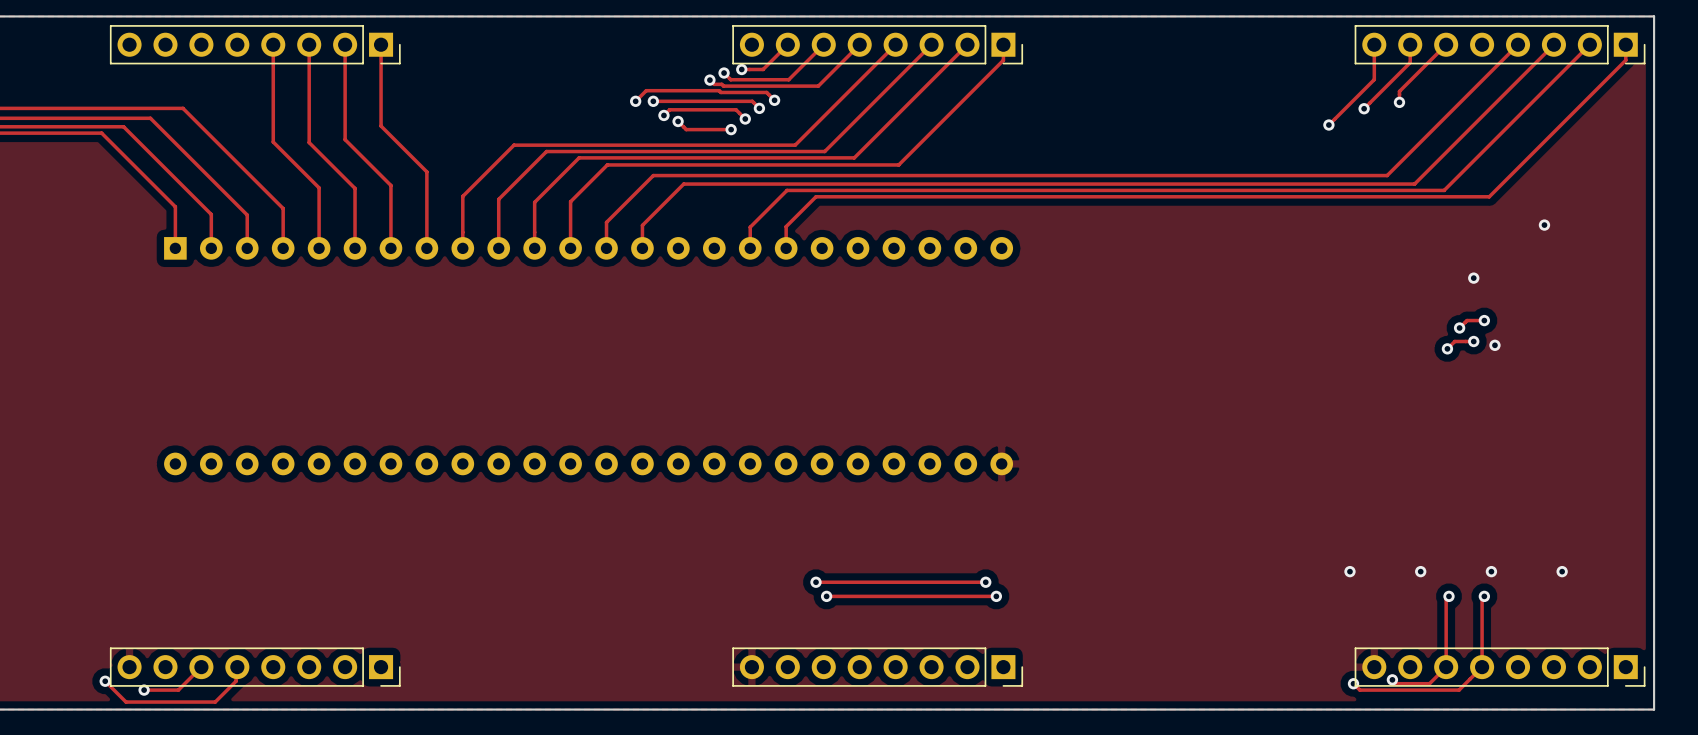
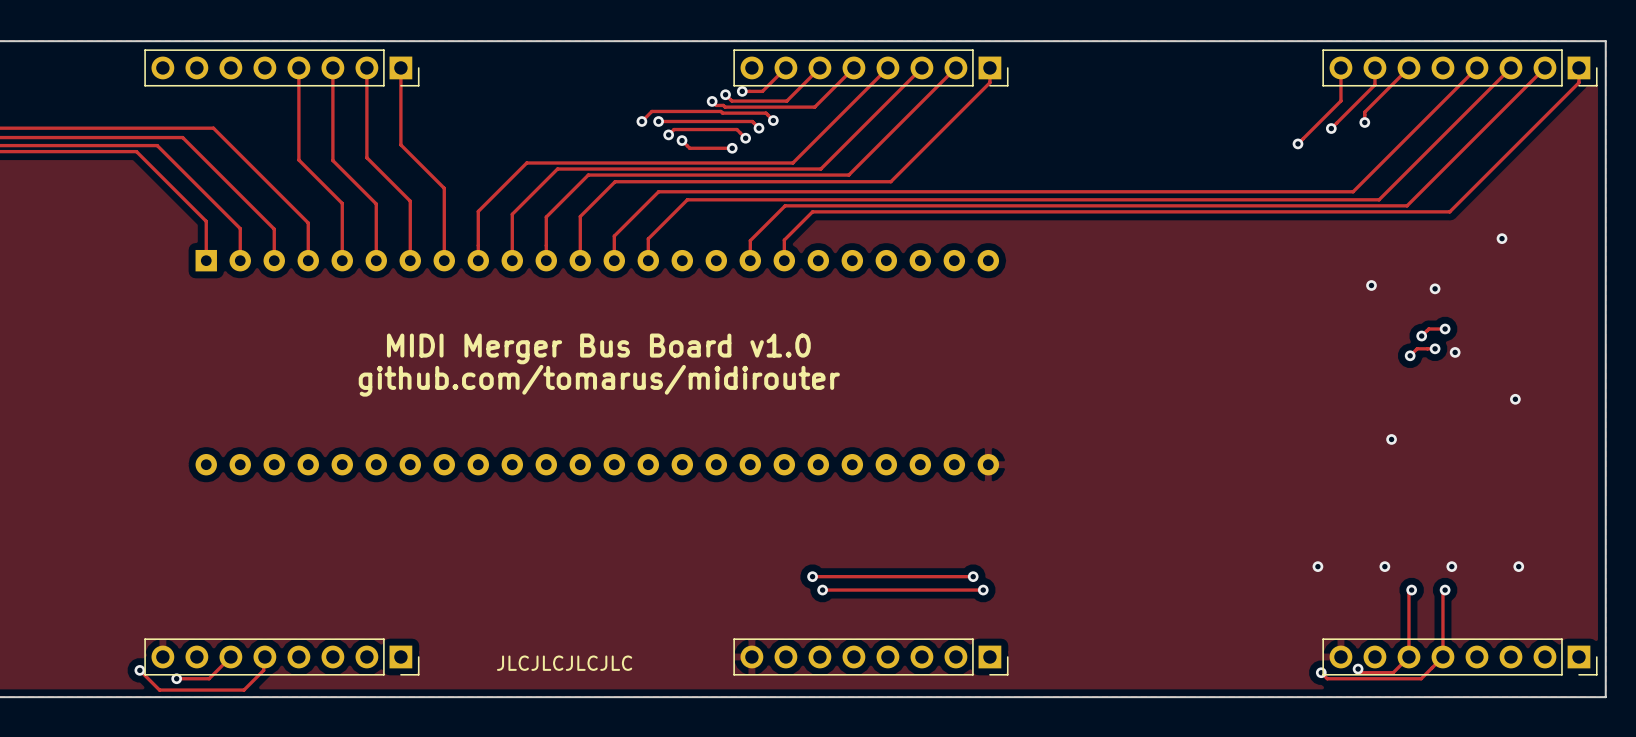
via: none -> (1371, 285)
text: none -> MIDI Merger Bus Board v1.0 (598, 348)
text: none -> github.com/tomarus/midirouter (599, 380)
via: none -> (1515, 399)
via: none -> (1391, 439)
text: none -> JLCJLCJLCJLC (564, 663)

